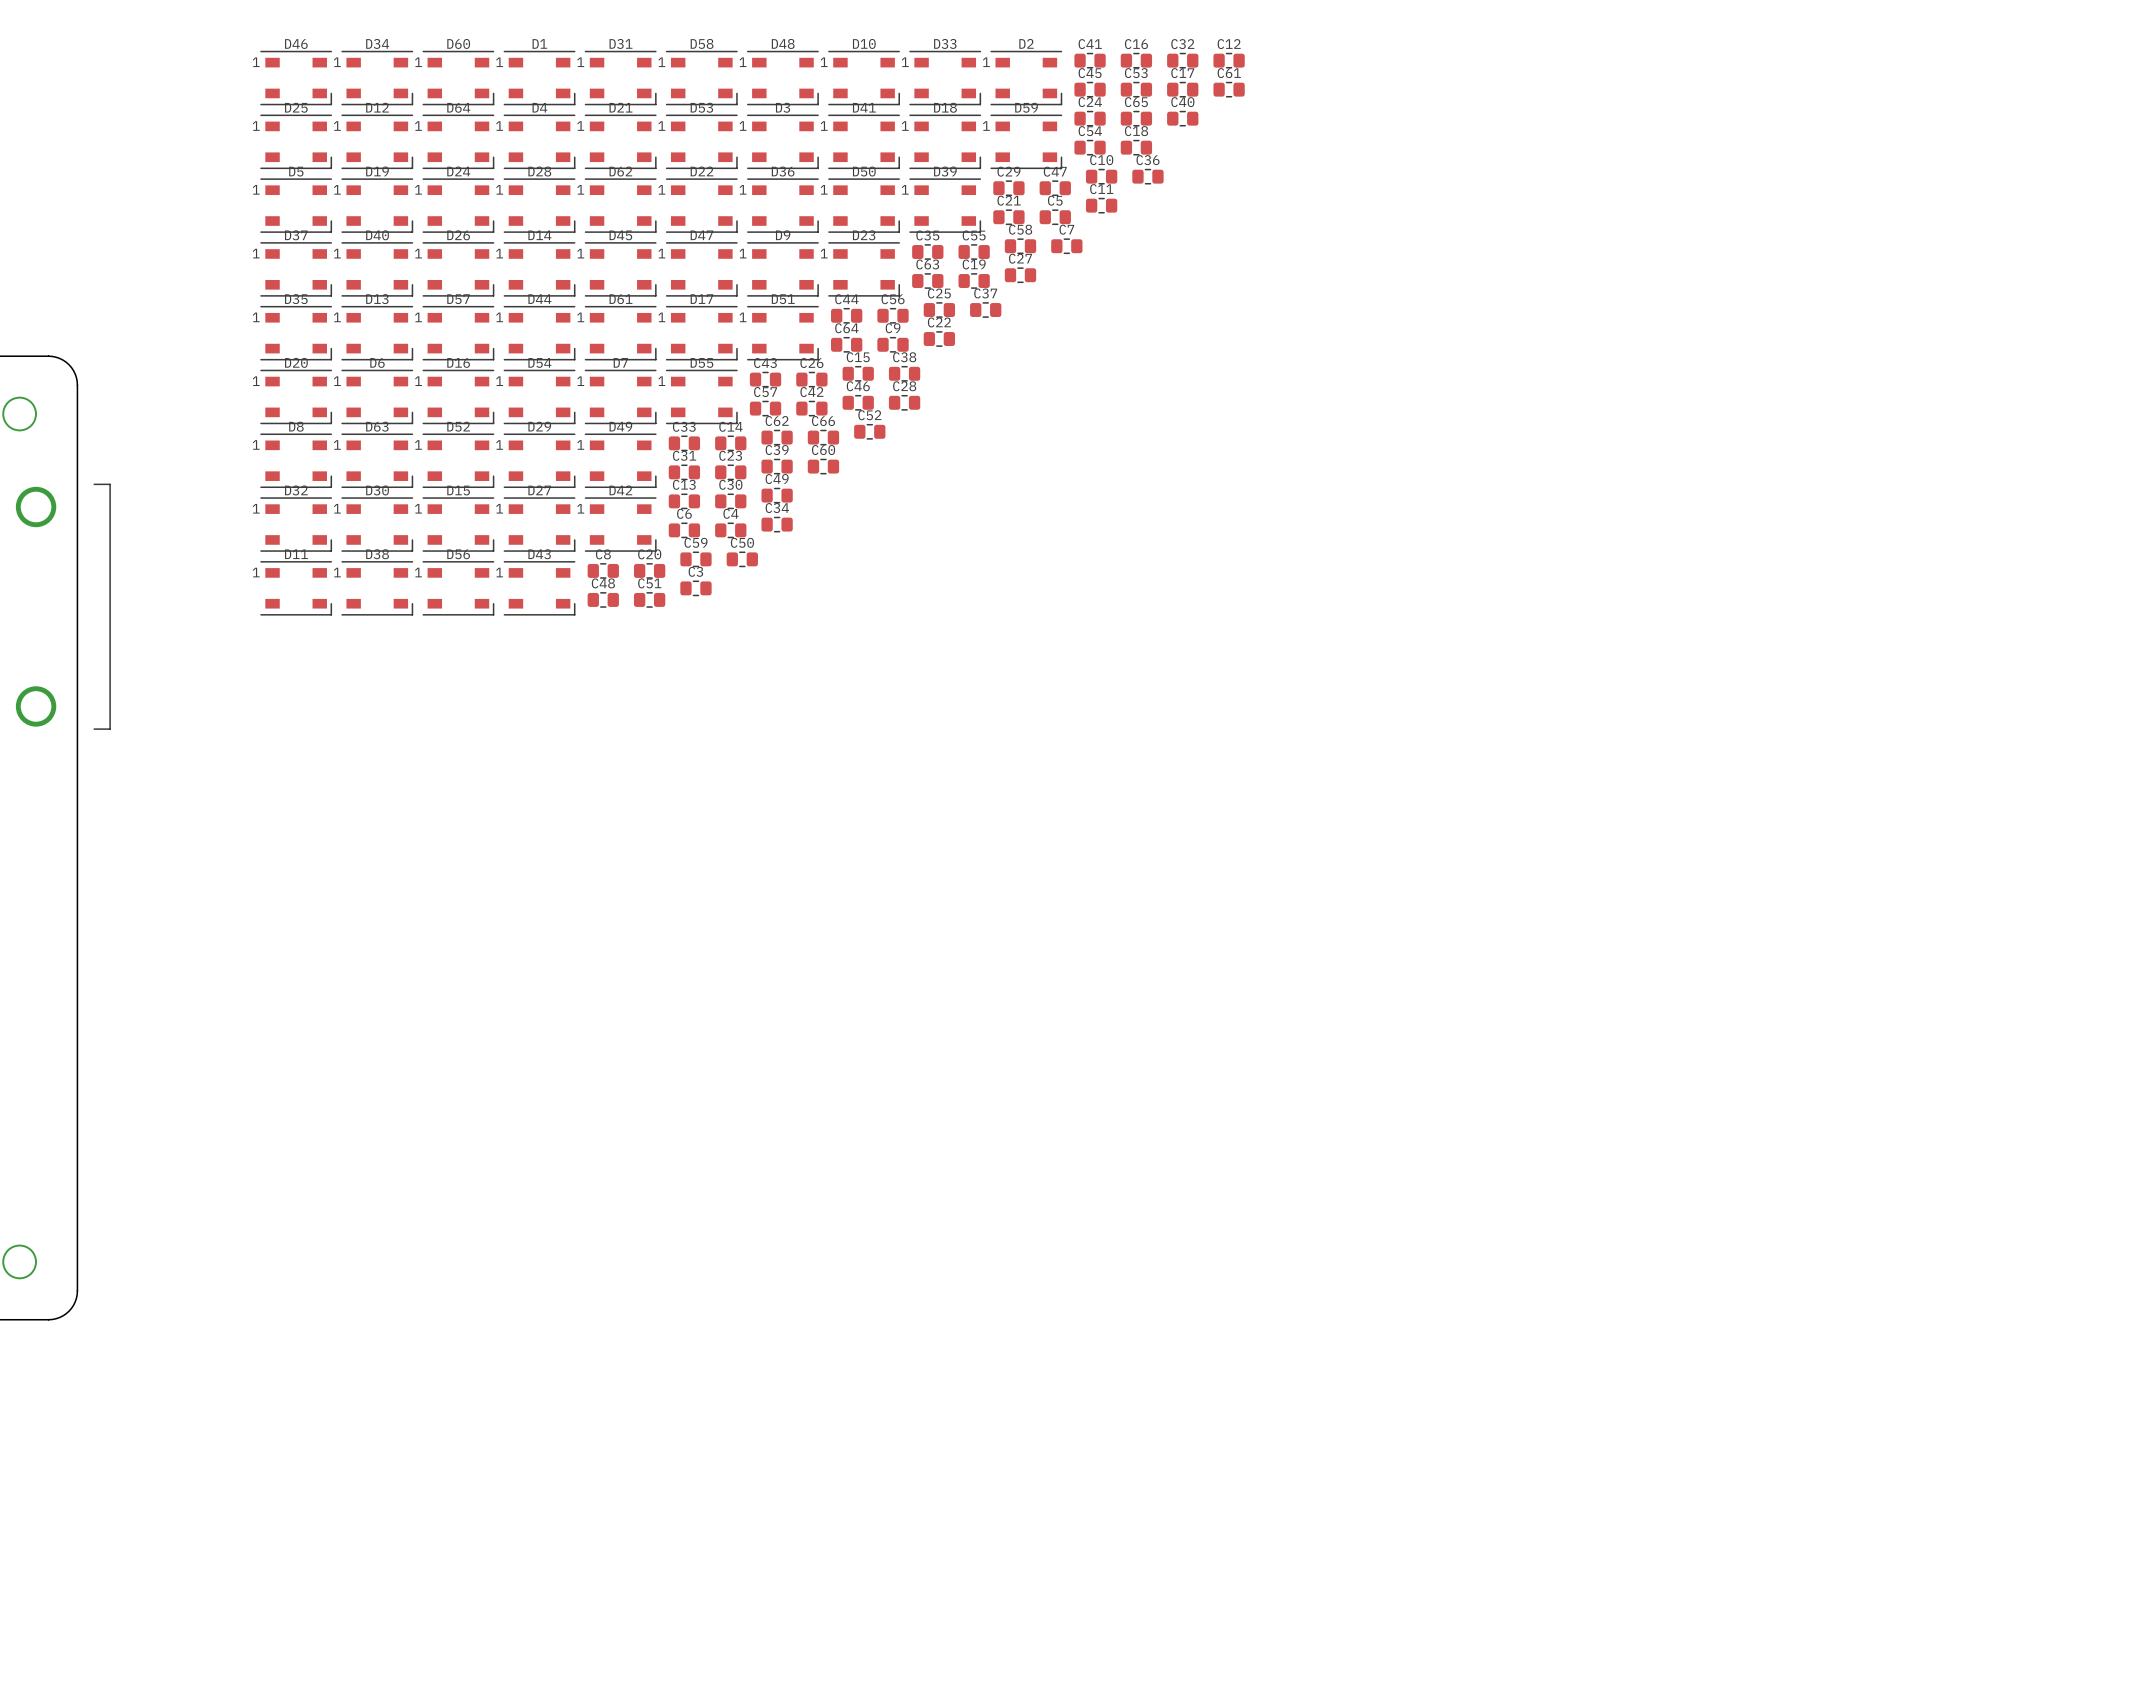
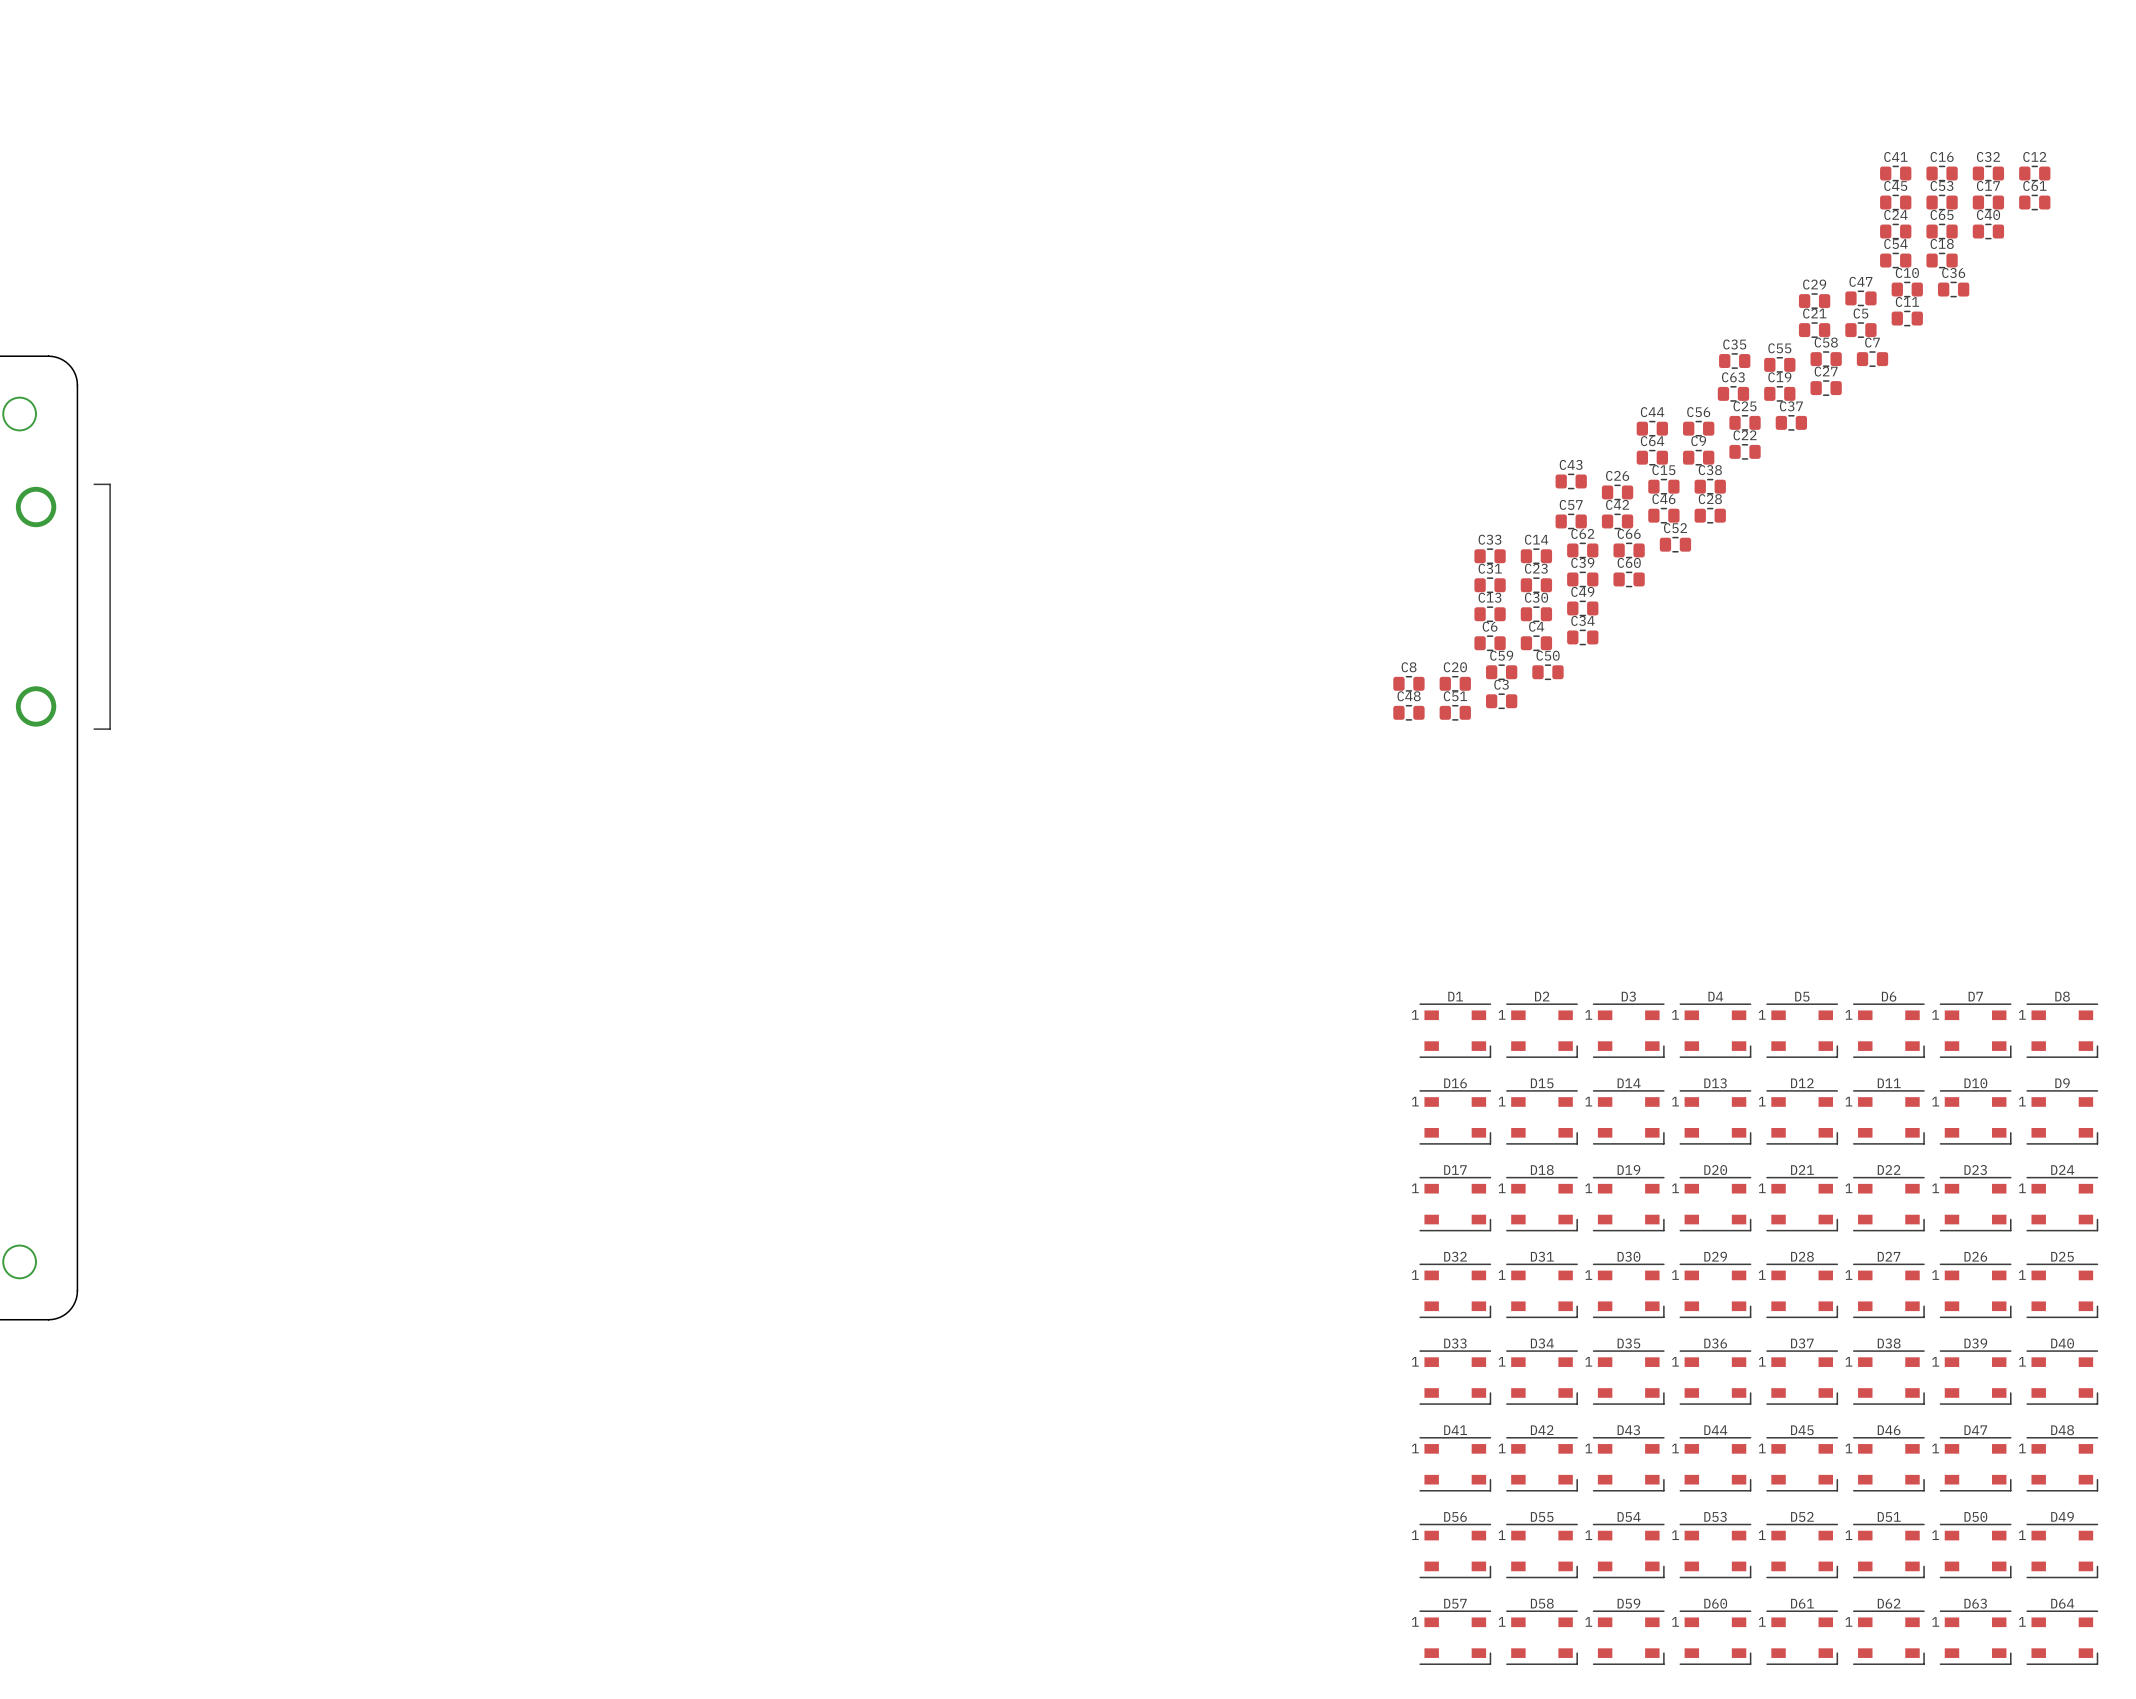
C41 position: (1090, 60) -> (1895, 173)
C16 position: (1136, 60) -> (1942, 173)
C32 position: (1182, 60) -> (1988, 173)
C12 position: (1229, 60) -> (2034, 173)
D46 position: (296, 78) -> (1888, 1464)
D34 position: (377, 78) -> (1542, 1377)
D60 position: (458, 78) -> (1715, 1637)
D1 position: (539, 78) -> (1455, 1030)
D31 position: (620, 78) -> (1542, 1290)
D58 position: (701, 78) -> (1542, 1637)
D48 position: (782, 78) -> (2062, 1464)
D10 position: (864, 78) -> (1975, 1117)
D33 position: (945, 78) -> (1455, 1377)
D2 position: (1026, 78) -> (1542, 1030)
C45 position: (1090, 89) -> (1895, 202)
C53 position: (1136, 89) -> (1942, 202)
C17 position: (1182, 89) -> (1988, 202)
C61 position: (1229, 89) -> (2034, 202)
C24 position: (1090, 118) -> (1895, 231)
C65 position: (1136, 118) -> (1942, 231)
C40 position: (1182, 118) -> (1988, 231)
D25 position: (296, 141) -> (2062, 1290)
D12 position: (377, 141) -> (1802, 1117)
D64 position: (458, 141) -> (2062, 1637)
D4 position: (539, 141) -> (1715, 1030)
D21 position: (620, 141) -> (1802, 1204)
D53 position: (701, 141) -> (1715, 1551)
D3 position: (782, 141) -> (1628, 1030)
D41 position: (864, 141) -> (1455, 1464)
D18 position: (945, 141) -> (1542, 1204)
D59 position: (1026, 141) -> (1628, 1637)
C54 position: (1090, 147) -> (1895, 260)
C18 position: (1136, 147) -> (1942, 260)
C10 position: (1101, 176) -> (1907, 289)
C36 position: (1147, 176) -> (1953, 289)
C29 position: (1008, 188) -> (1814, 301)
C47 position: (1055, 188) -> (1860, 298)
D5 position: (296, 205) -> (1802, 1030)
D19 position: (377, 205) -> (1628, 1204)
D24 position: (458, 205) -> (2062, 1204)
D28 position: (539, 205) -> (1802, 1290)
D62 position: (620, 205) -> (1888, 1637)
D22 position: (701, 205) -> (1888, 1204)
D36 position: (782, 205) -> (1715, 1377)
D50 position: (864, 205) -> (1975, 1551)
D39 position: (945, 205) -> (1975, 1377)
C11 position: (1101, 205) -> (1907, 318)
C21 position: (1008, 217) -> (1814, 330)
C5 position: (1055, 217) -> (1860, 330)
C58 position: (1020, 246) -> (1826, 359)
C7 position: (1066, 246) -> (1872, 359)
C35 position: (927, 252) -> (1734, 361)
C55 position: (974, 252) -> (1779, 364)
D37 position: (296, 269) -> (1802, 1377)
D40 position: (377, 269) -> (2062, 1377)
D26 position: (458, 269) -> (1975, 1290)
D14 position: (539, 269) -> (1628, 1117)
D45 position: (620, 269) -> (1802, 1464)
D47 position: (701, 269) -> (1975, 1464)
D9 position: (782, 269) -> (2062, 1117)
D23 position: (864, 269) -> (1975, 1204)
C27 position: (1020, 275) -> (1826, 388)
C63 position: (927, 281) -> (1733, 393)
C19 position: (974, 281) -> (1779, 393)
C25 position: (939, 310) -> (1745, 422)
C37 position: (985, 310) -> (1791, 422)
C44 position: (846, 315) -> (1652, 428)
C56 position: (893, 315) -> (1698, 428)
D35 position: (296, 333) -> (1628, 1377)
D13 position: (377, 333) -> (1715, 1117)
D57 position: (458, 333) -> (1455, 1637)
D44 position: (539, 333) -> (1715, 1464)
D61 position: (620, 333) -> (1802, 1637)
D17 position: (701, 333) -> (1455, 1204)
D51 position: (782, 333) -> (1888, 1551)
C22 position: (939, 339) -> (1745, 451)
C64 position: (846, 344) -> (1652, 457)
C9 position: (893, 344) -> (1698, 457)
C15 position: (858, 373) -> (1663, 486)
C38 position: (904, 373) -> (1710, 486)
C43 position: (765, 379) -> (1571, 481)
C26 position: (811, 379) -> (1617, 492)
D20 position: (296, 396) -> (1715, 1204)
D6 position: (377, 396) -> (1888, 1030)
D16 position: (458, 396) -> (1455, 1117)
D54 position: (539, 396) -> (1628, 1551)
D7 position: (620, 396) -> (1975, 1030)
D55 position: (701, 396) -> (1542, 1551)
C46 position: (858, 402) -> (1663, 515)
C28 position: (904, 402) -> (1710, 515)
C57 position: (765, 408) -> (1571, 521)
C42 position: (811, 408) -> (1617, 521)
C52 position: (869, 431) -> (1675, 544)
C62 position: (777, 437) -> (1582, 550)
C66 position: (823, 437) -> (1629, 550)
C33 position: (684, 443) -> (1490, 556)
C14 position: (730, 443) -> (1536, 556)
D8 position: (296, 460) -> (2062, 1030)
D63 position: (377, 460) -> (1975, 1637)
D52 position: (458, 460) -> (1802, 1551)
D29 position: (539, 460) -> (1715, 1290)
D49 position: (620, 460) -> (2062, 1551)
C39 position: (777, 466) -> (1582, 579)
C60 position: (823, 466) -> (1629, 579)
C31 position: (684, 472) -> (1490, 585)
C23 position: (730, 472) -> (1536, 585)
C49 position: (777, 495) -> (1582, 608)
C13 position: (684, 501) -> (1490, 614)
C30 position: (730, 501) -> (1536, 614)
D32 position: (296, 524) -> (1455, 1290)
D30 position: (377, 524) -> (1628, 1290)
D15 position: (458, 524) -> (1542, 1117)
D27 position: (539, 524) -> (1888, 1290)
D42 position: (620, 524) -> (1542, 1464)
C34 position: (777, 524) -> (1582, 637)
C6 position: (684, 530) -> (1490, 643)
C4 position: (730, 530) -> (1536, 643)
C59 position: (695, 559) -> (1501, 672)
C50 position: (742, 559) -> (1547, 672)
C8 position: (603, 570) -> (1408, 683)
C20 position: (649, 570) -> (1455, 683)
D11 position: (296, 588) -> (1888, 1117)
D38 position: (377, 588) -> (1888, 1377)
D56 position: (458, 588) -> (1455, 1551)
D43 position: (539, 588) -> (1628, 1464)
C3 position: (695, 588) -> (1501, 701)
C48 position: (603, 599) -> (1408, 712)
C51 position: (649, 599) -> (1455, 712)

